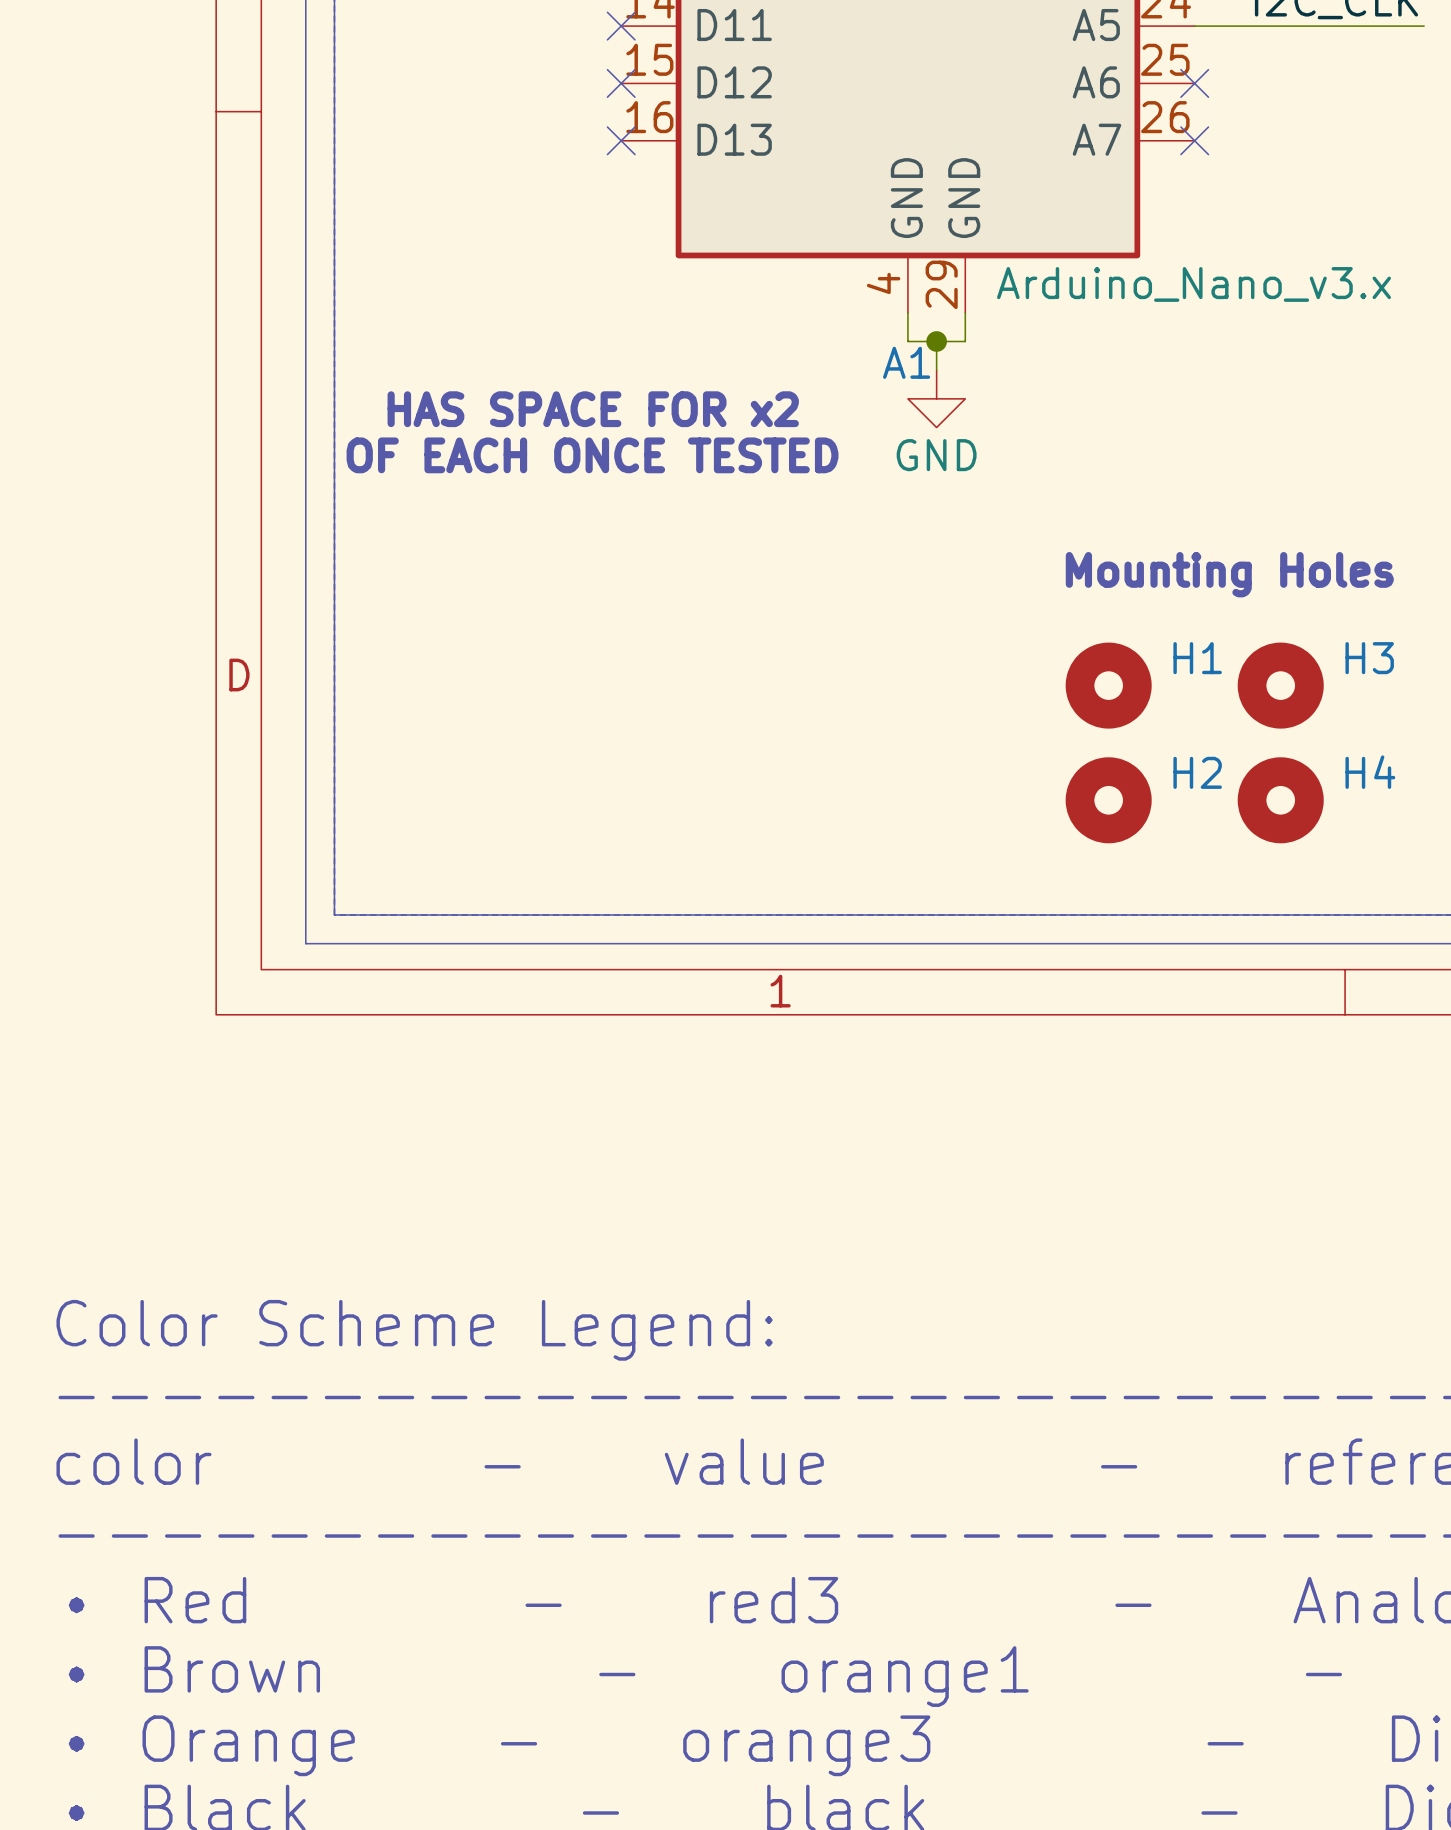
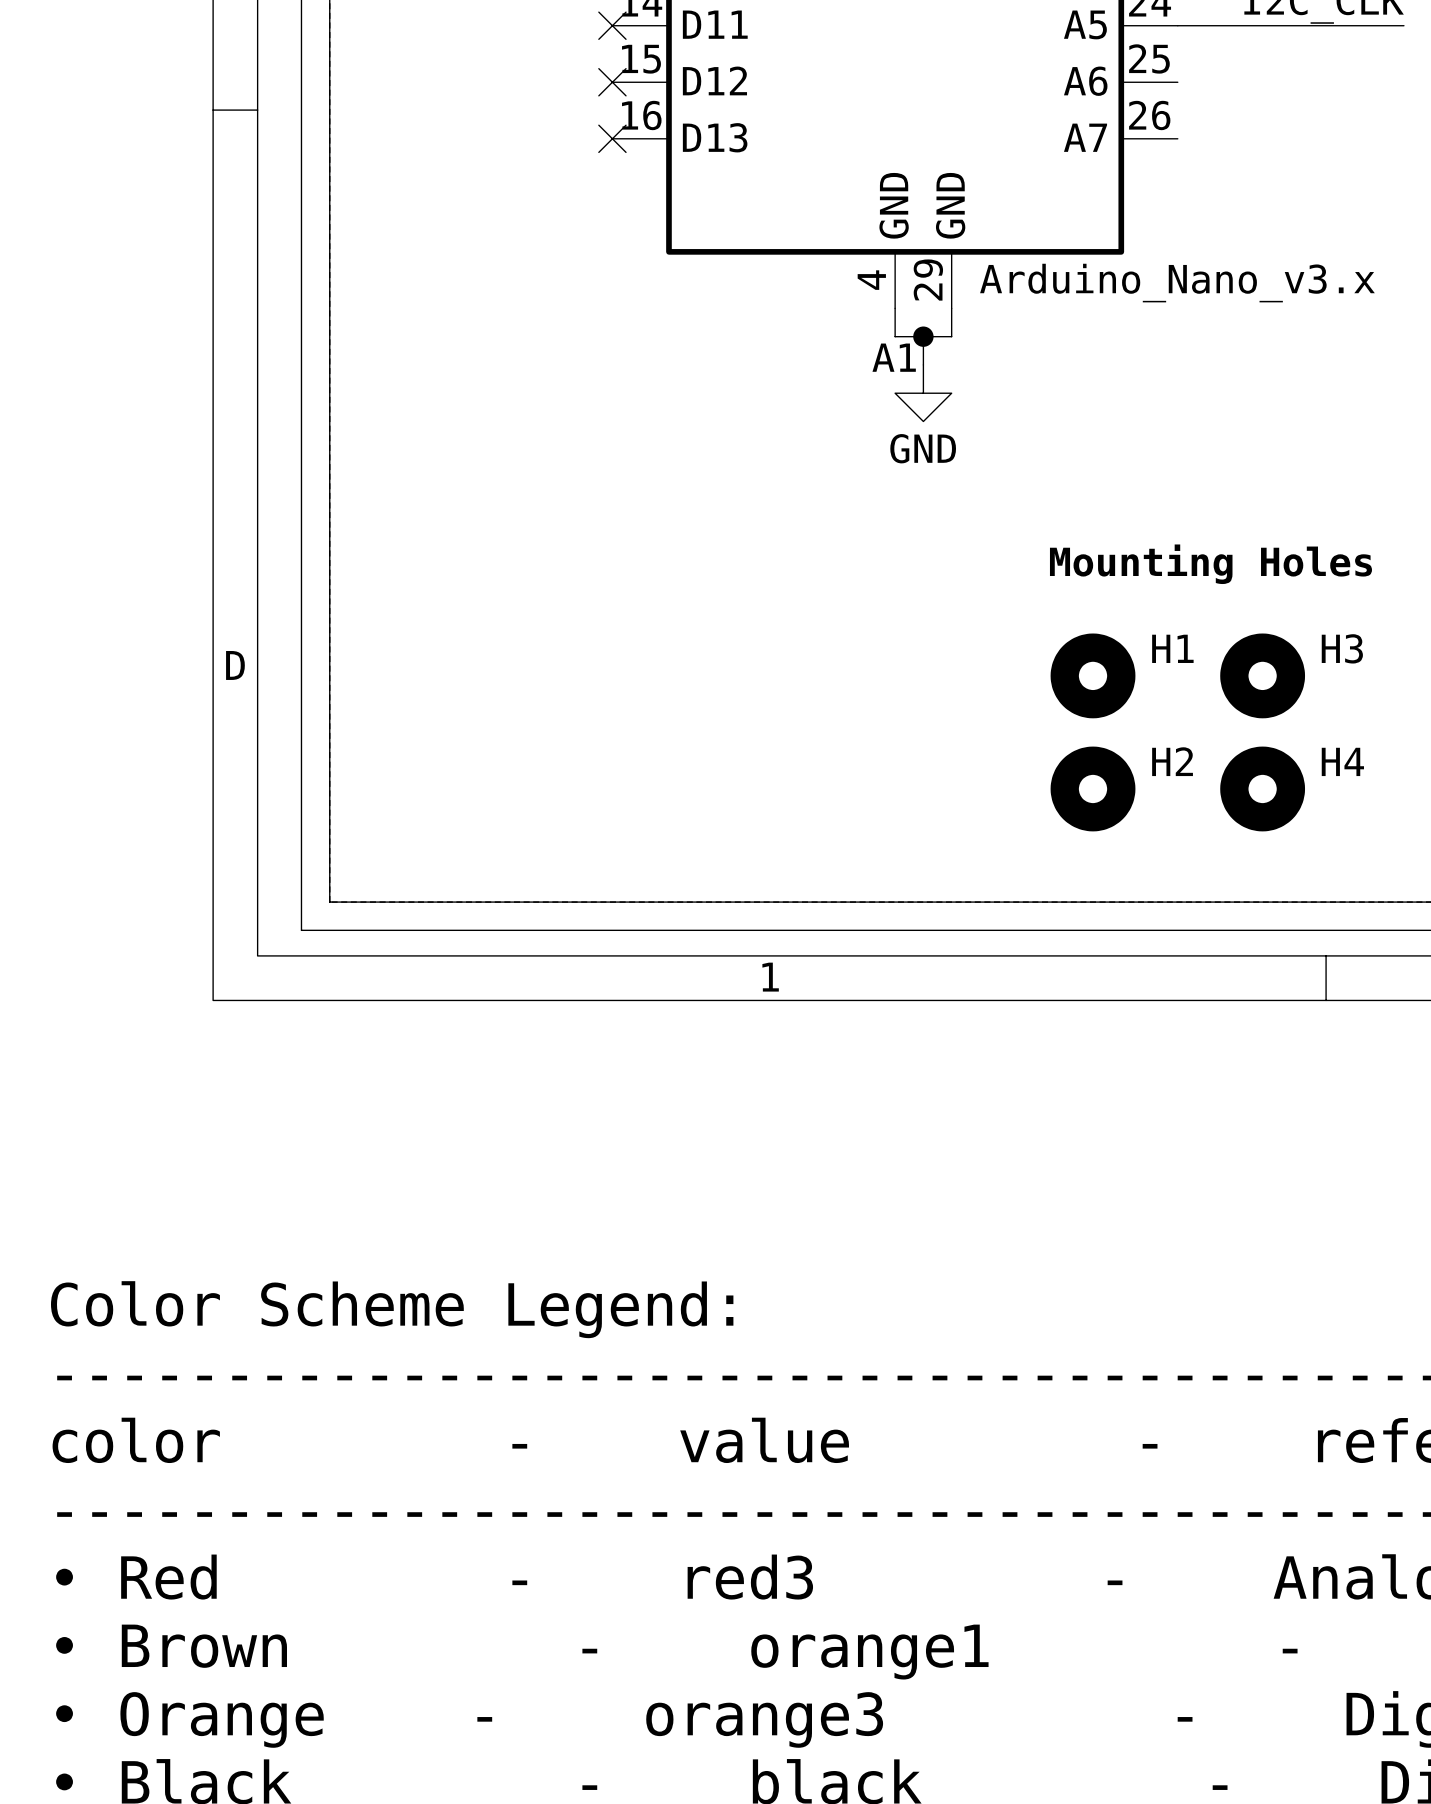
no-connect mark: (1194, 83) -> none
no-connect mark: (1194, 140) -> none
text: HAS SPACE FOR x2 (593, 409) -> none
text: OF EACH ONCE TESTED (592, 455) -> none

